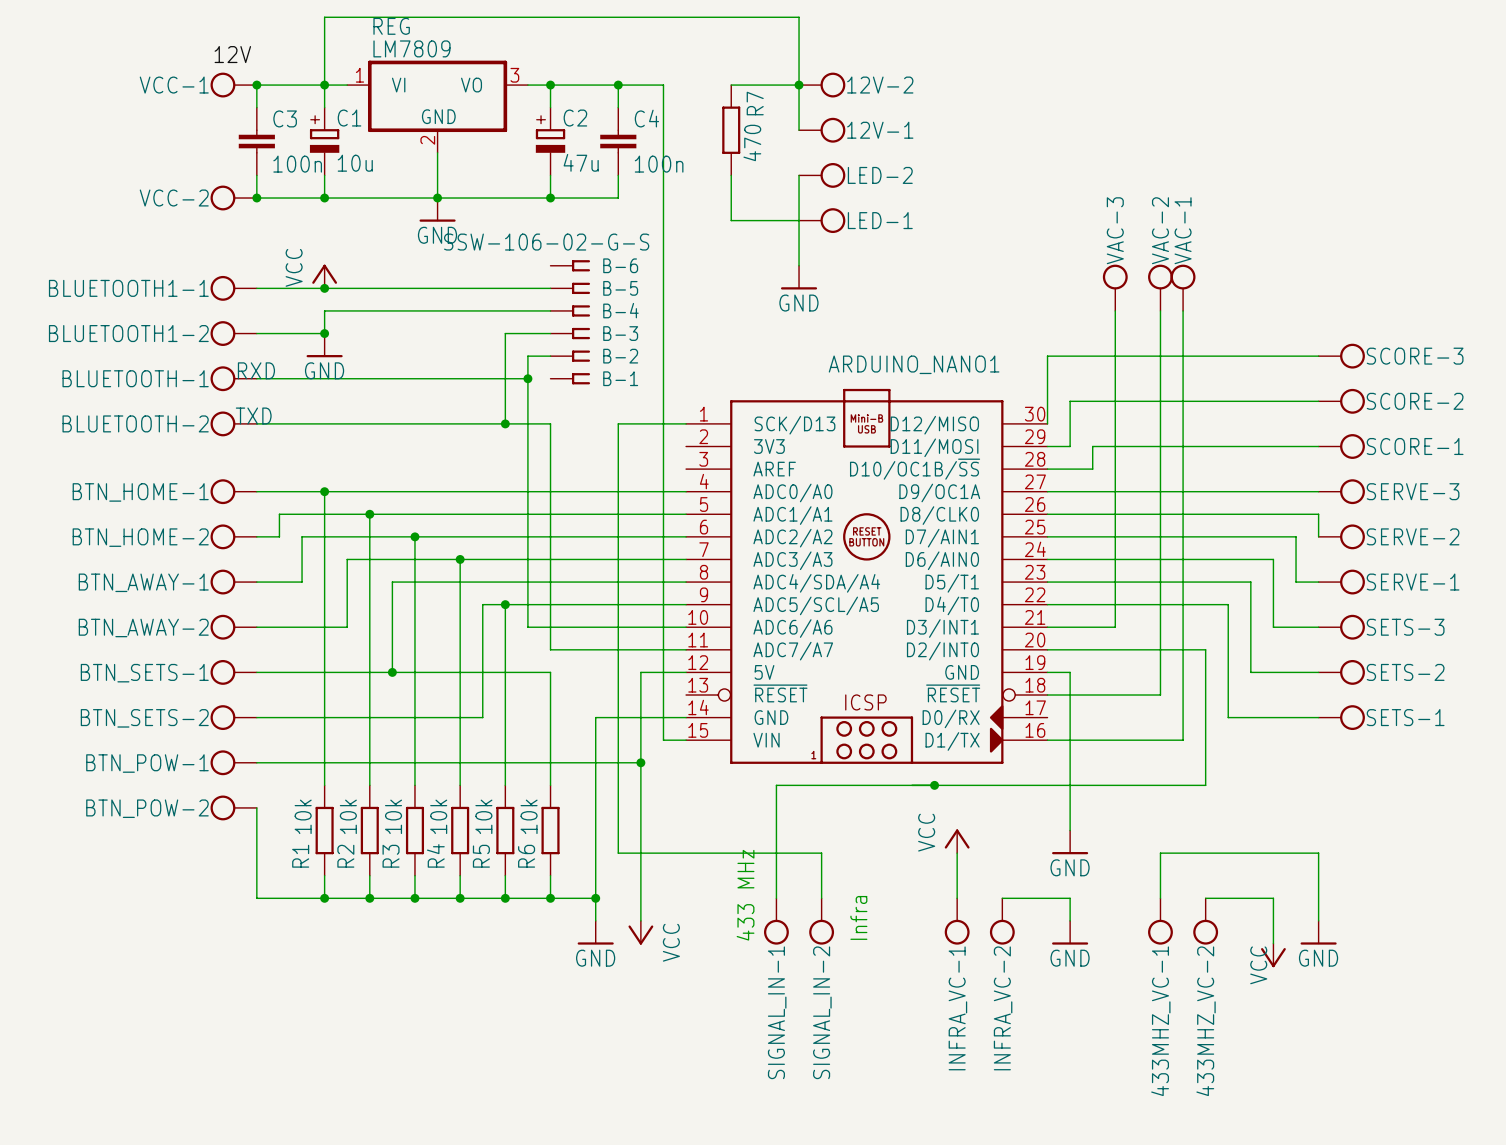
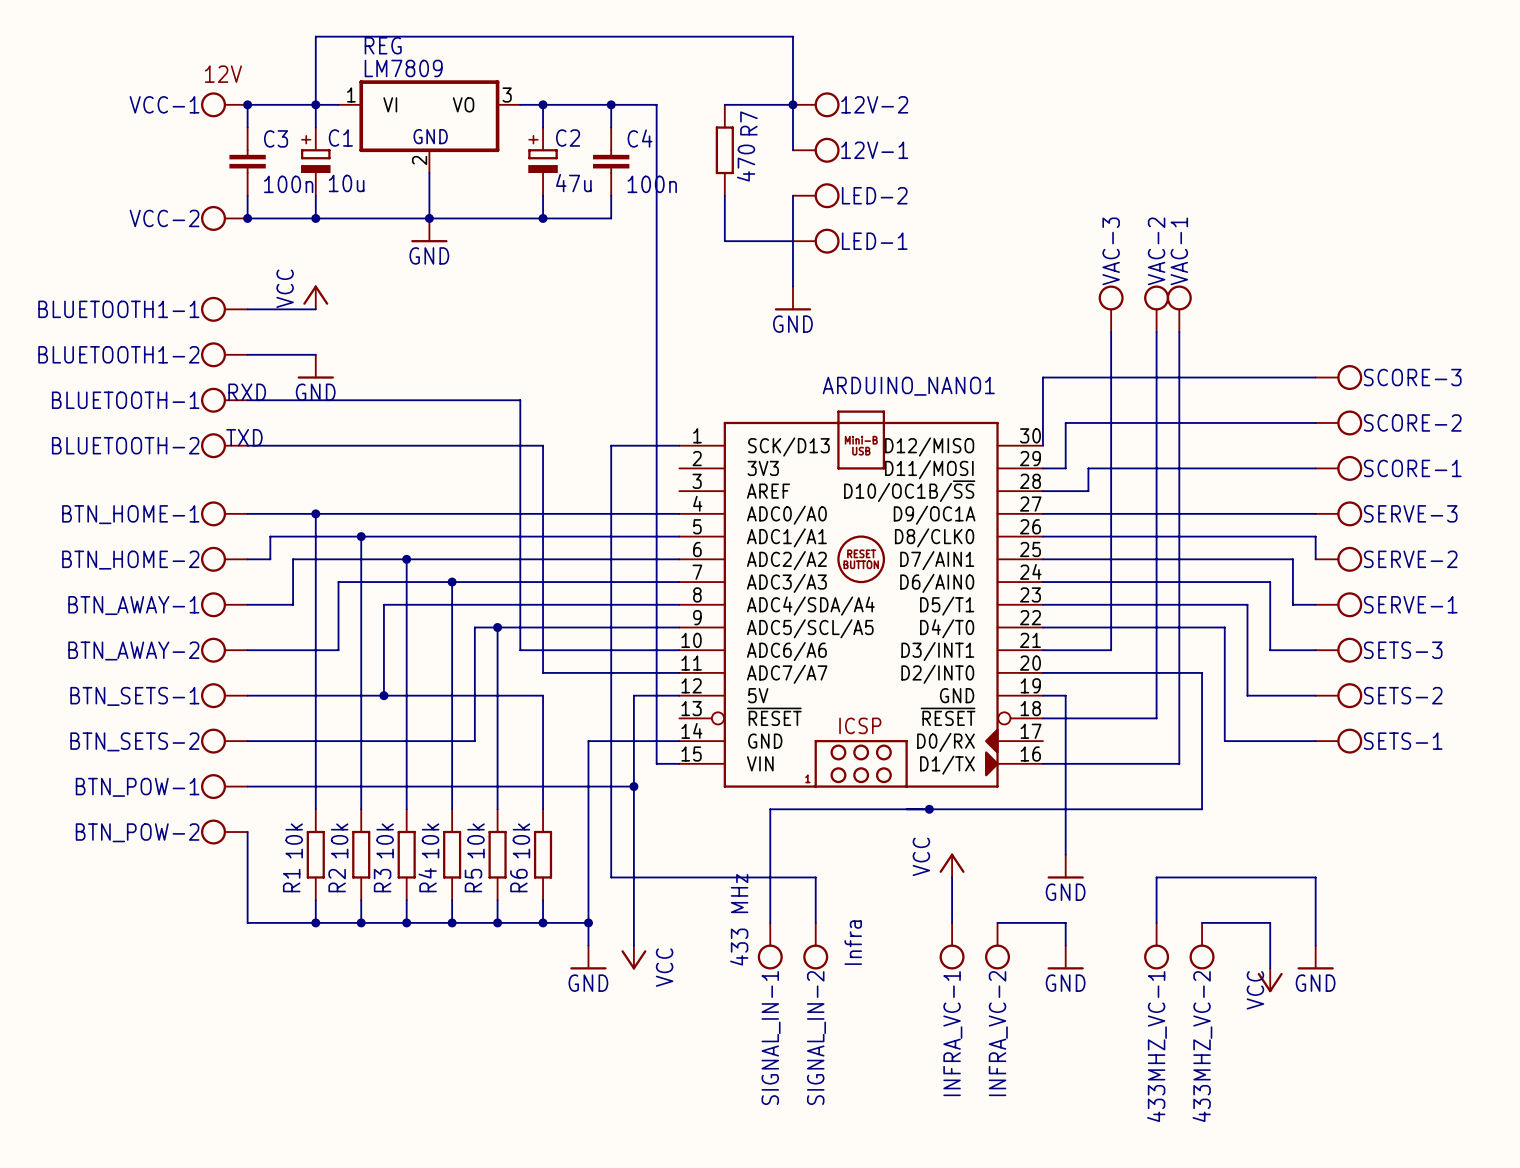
B-6: (570, 265) -> none
wire: (324, 288) (550, 288) -> none
junction: (324, 288) -> none
B-5: (570, 288) -> none
wire: (550, 310) (324, 310) (324, 333) -> none
B-4: (570, 310) -> none
junction: (324, 333) -> none
wire: (550, 333) (505, 333) (505, 423) -> none
B-3: (570, 333) -> none
wire: (550, 356) (527, 356) (527, 378) -> none
B-2: (570, 356) -> none
junction: (527, 378) -> none
B-1: SSW-106-02-G-S (570, 378) -> none
junction: (505, 423) -> none

